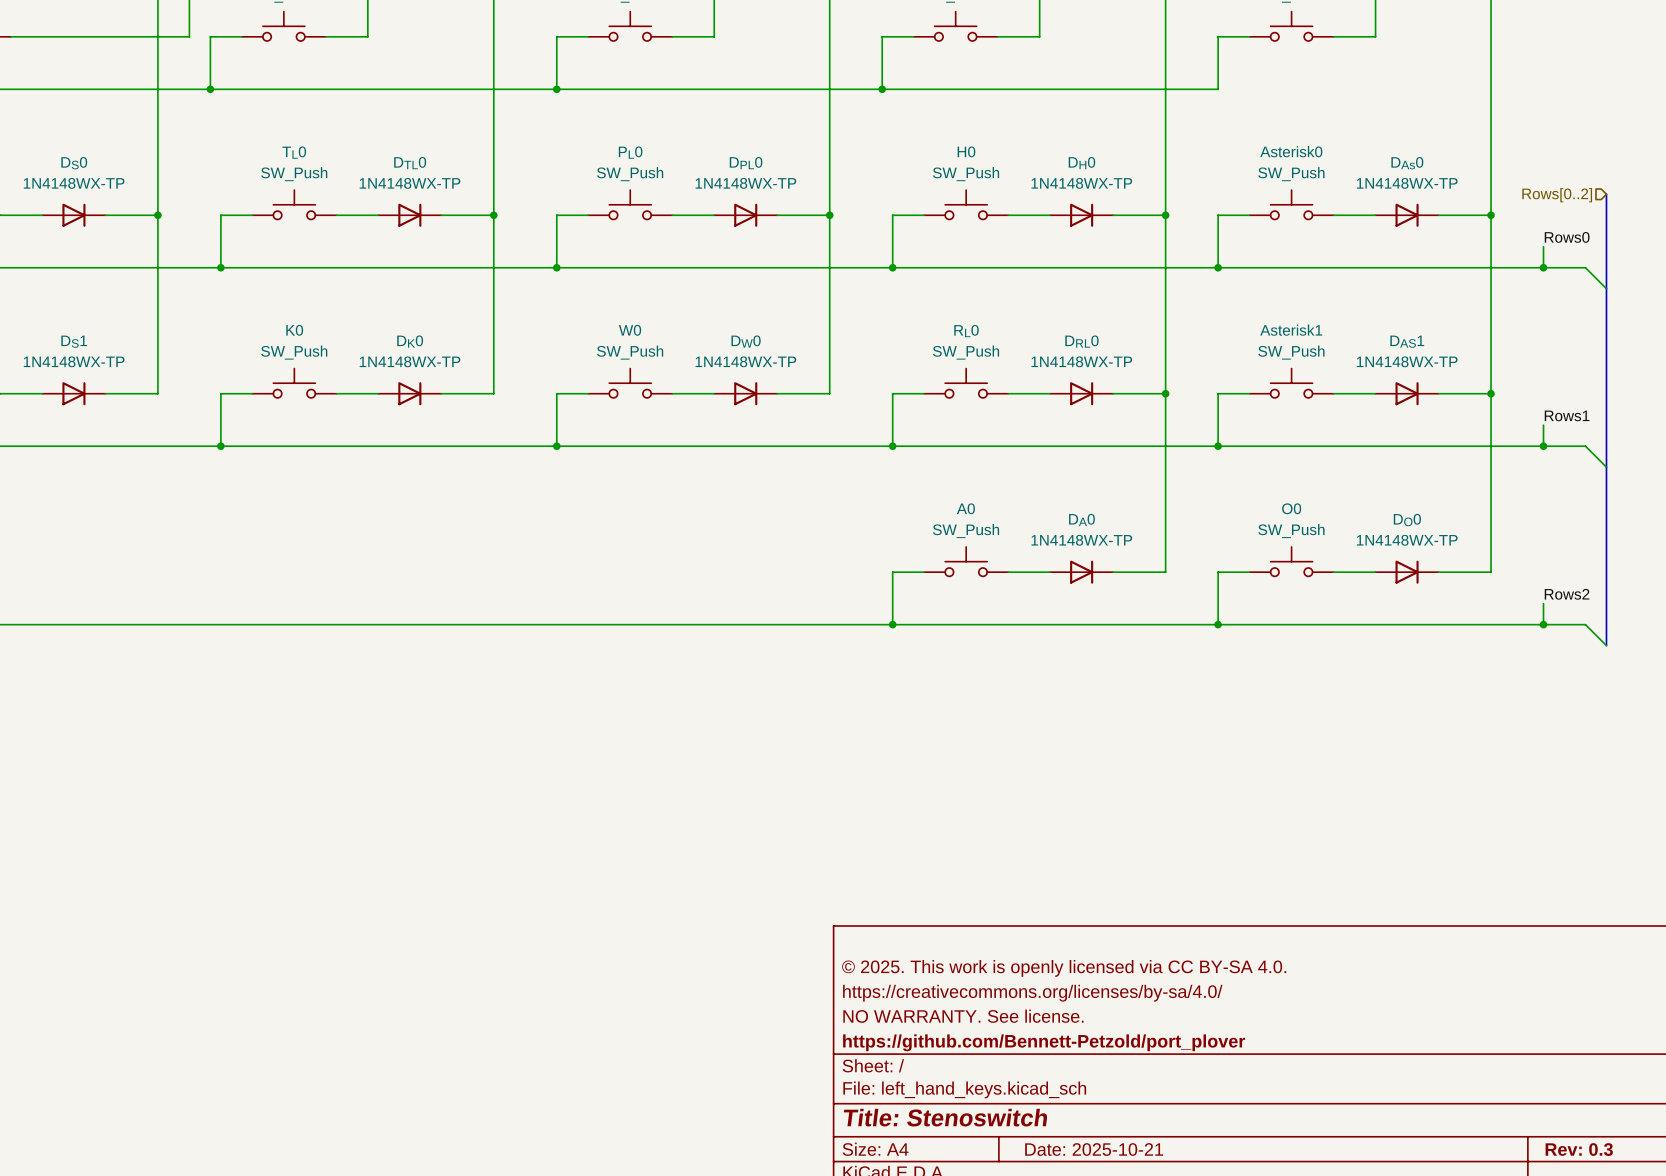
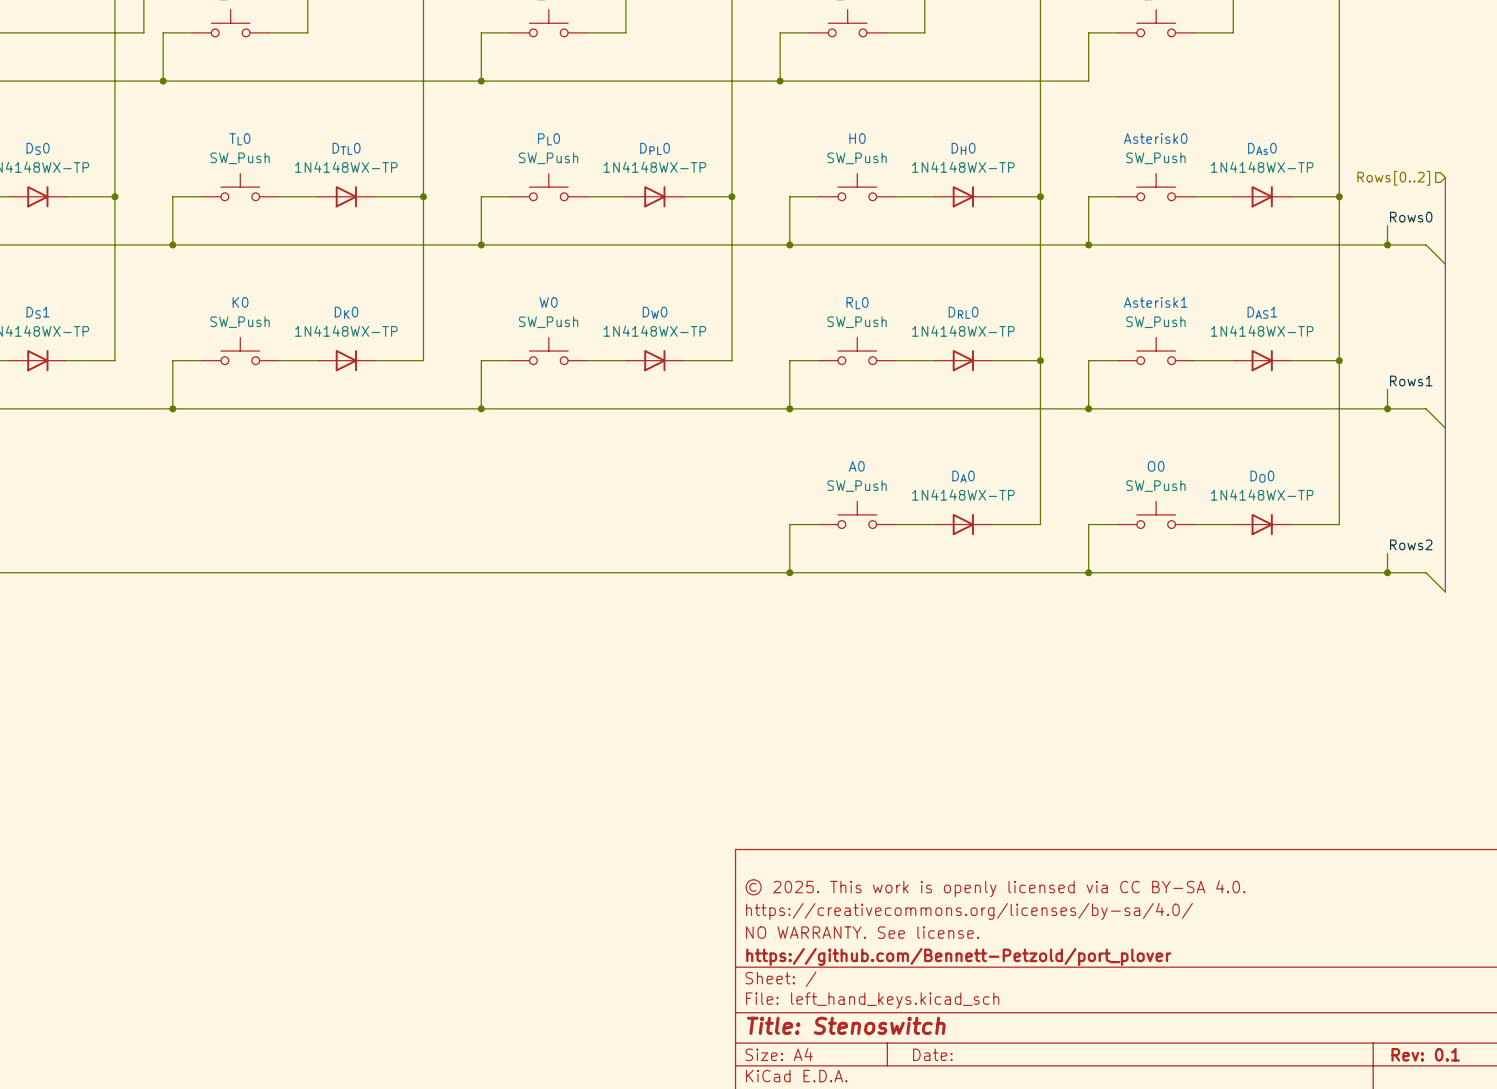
title block: Date: 2025-10-21 (1094, 1149) -> Date: (932, 1054)
title block: Rev: 0.3 (1579, 1149) -> Rev: 0.1 (1425, 1054)

